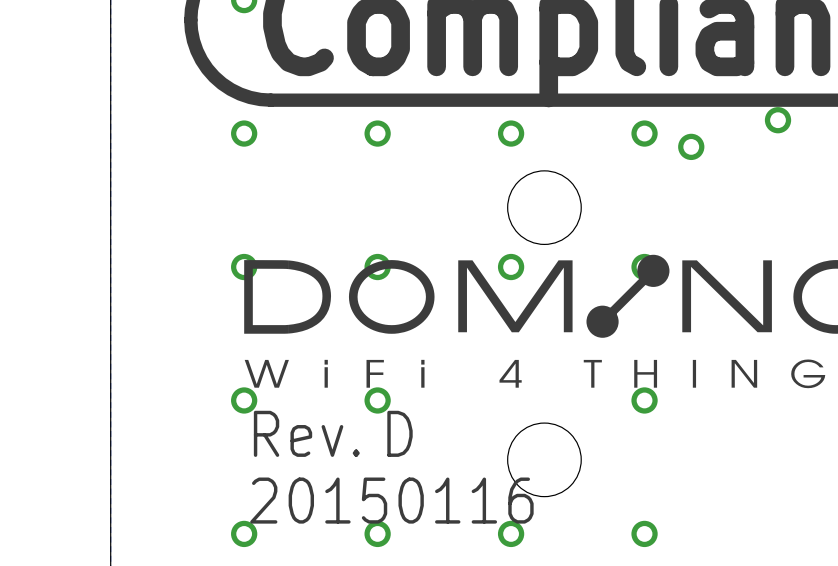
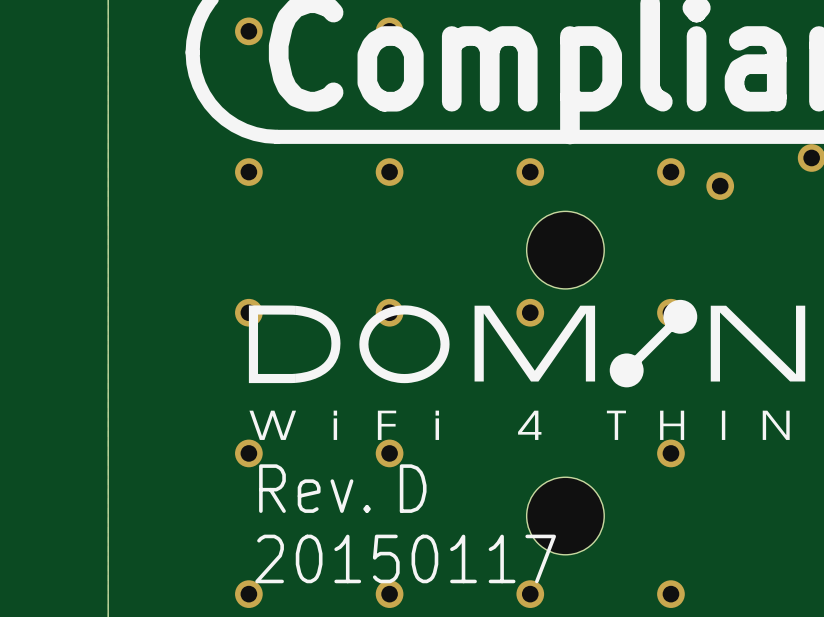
text: 20150116 (391, 500) -> 20150117 (405, 558)

